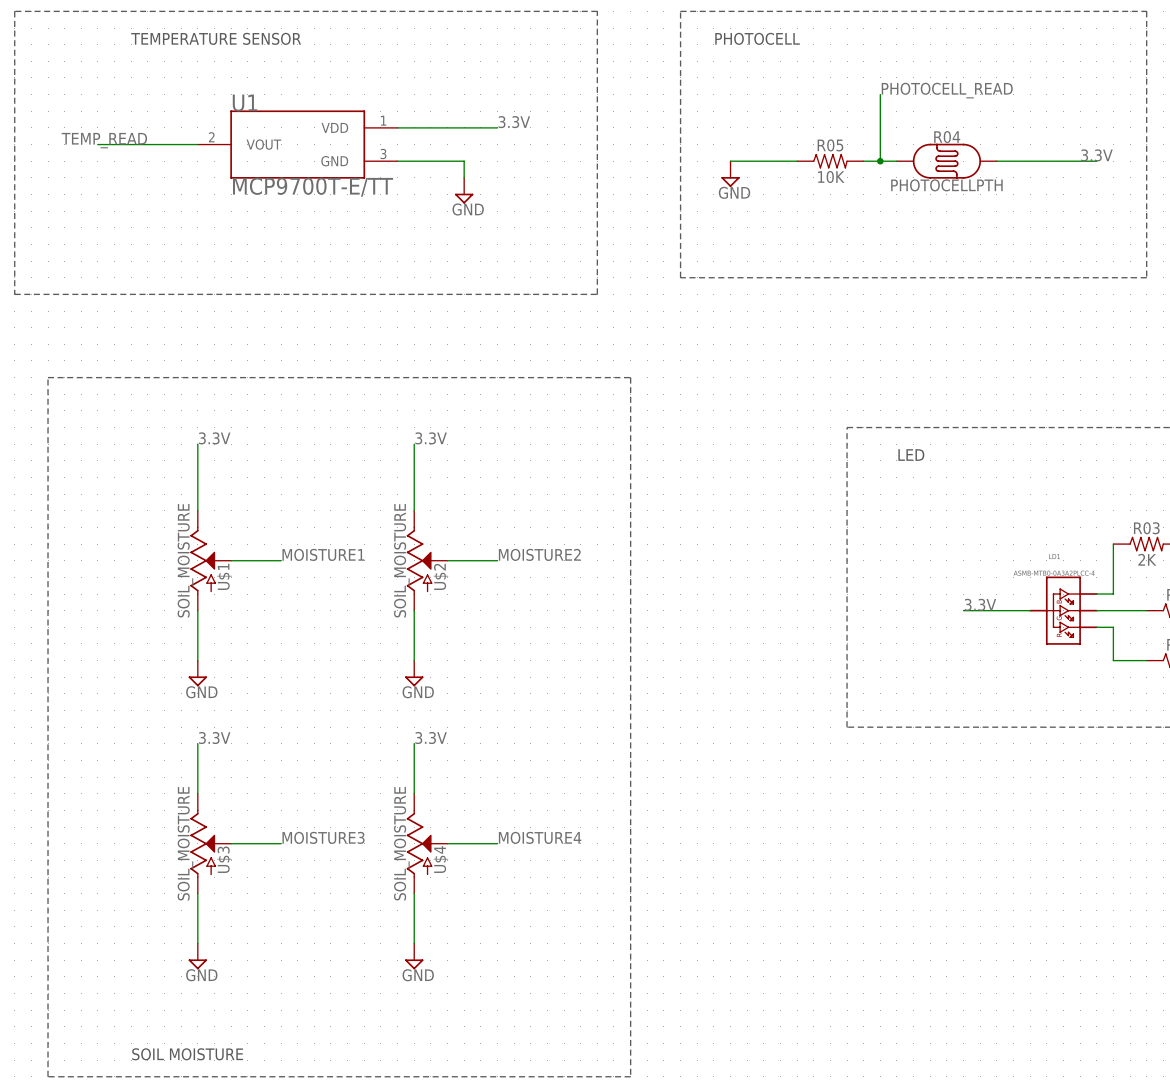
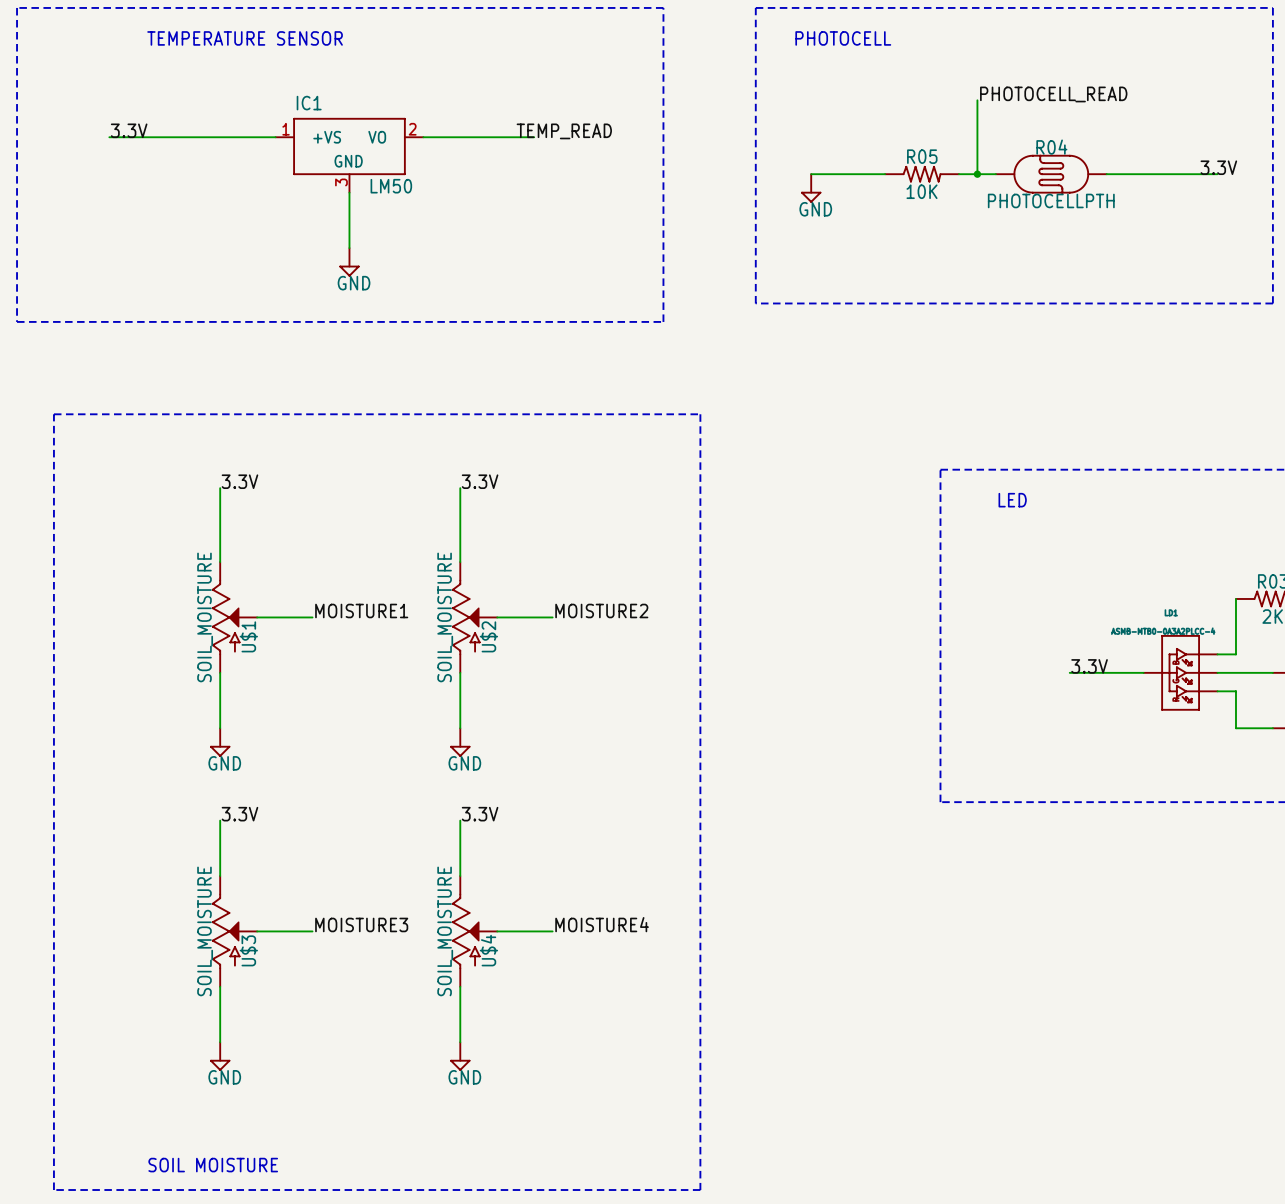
label: none -> 3.3V (129, 130)
label: 3.3V (514, 122) -> none
label: none -> TEMP_READ (564, 131)
wire: none -> (109, 137) (275, 137)
label: TEMP_READ (104, 140) -> none
wire: (97, 144) (197, 144) -> none
U1: MCP9700T-E/TT (297, 144) -> none
IC1: none -> LM50 (349, 155)
wire: (397, 161) (464, 161) (464, 177) -> none
wire: none -> (349, 192) (349, 248)
power symbol position: GND (464, 190) -> GND (349, 262)

